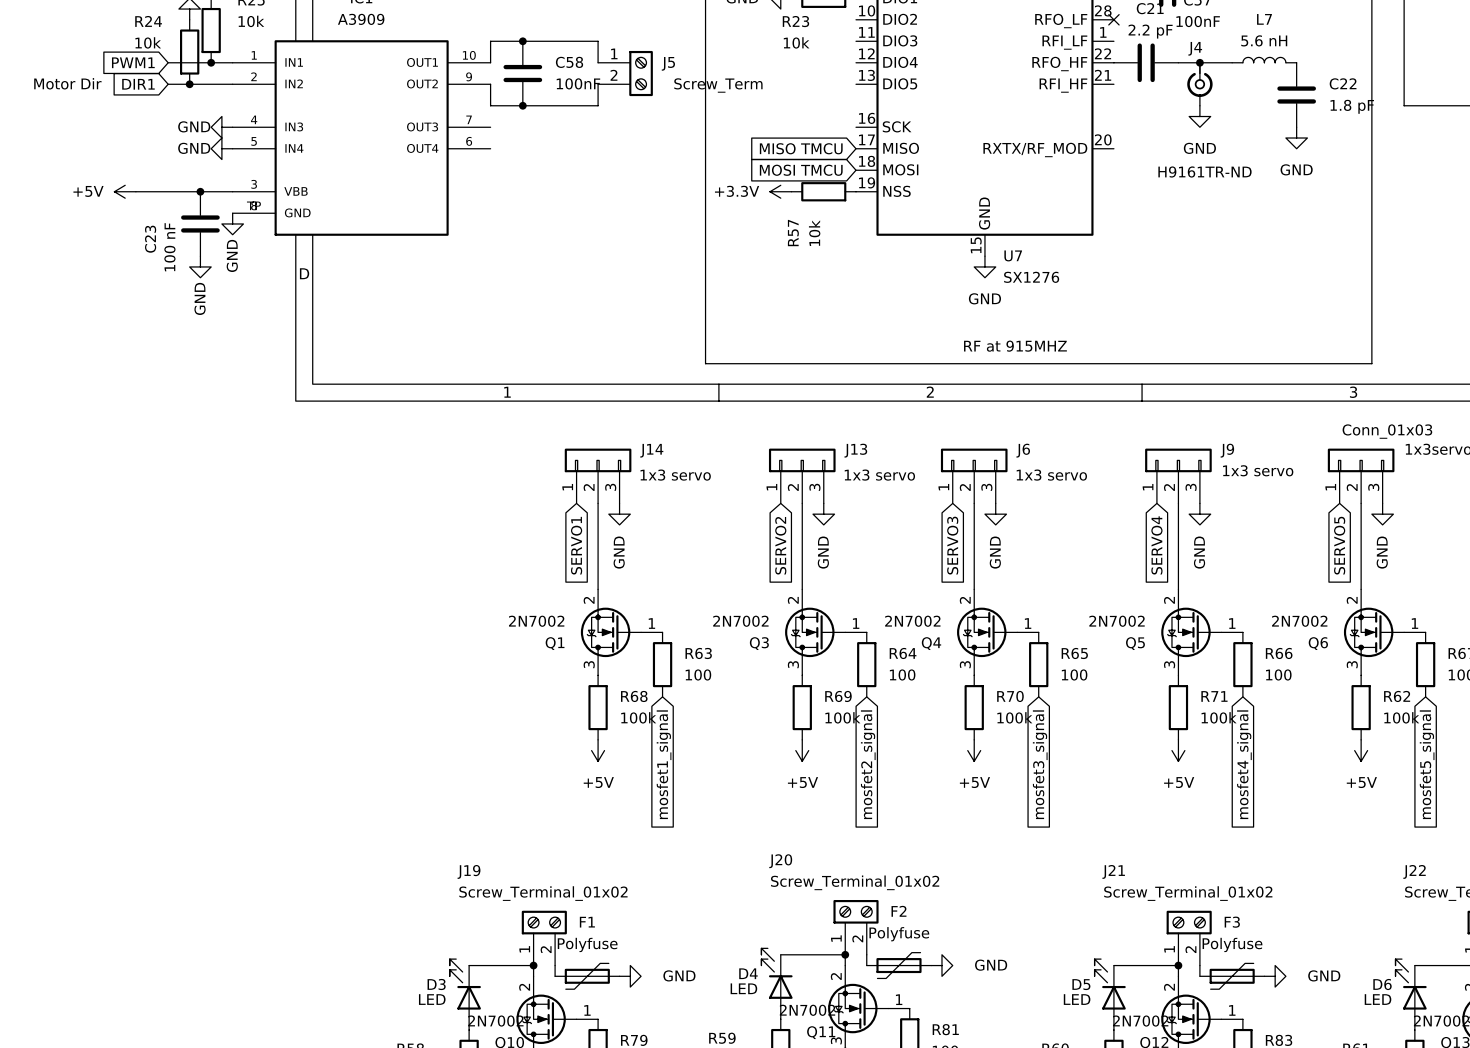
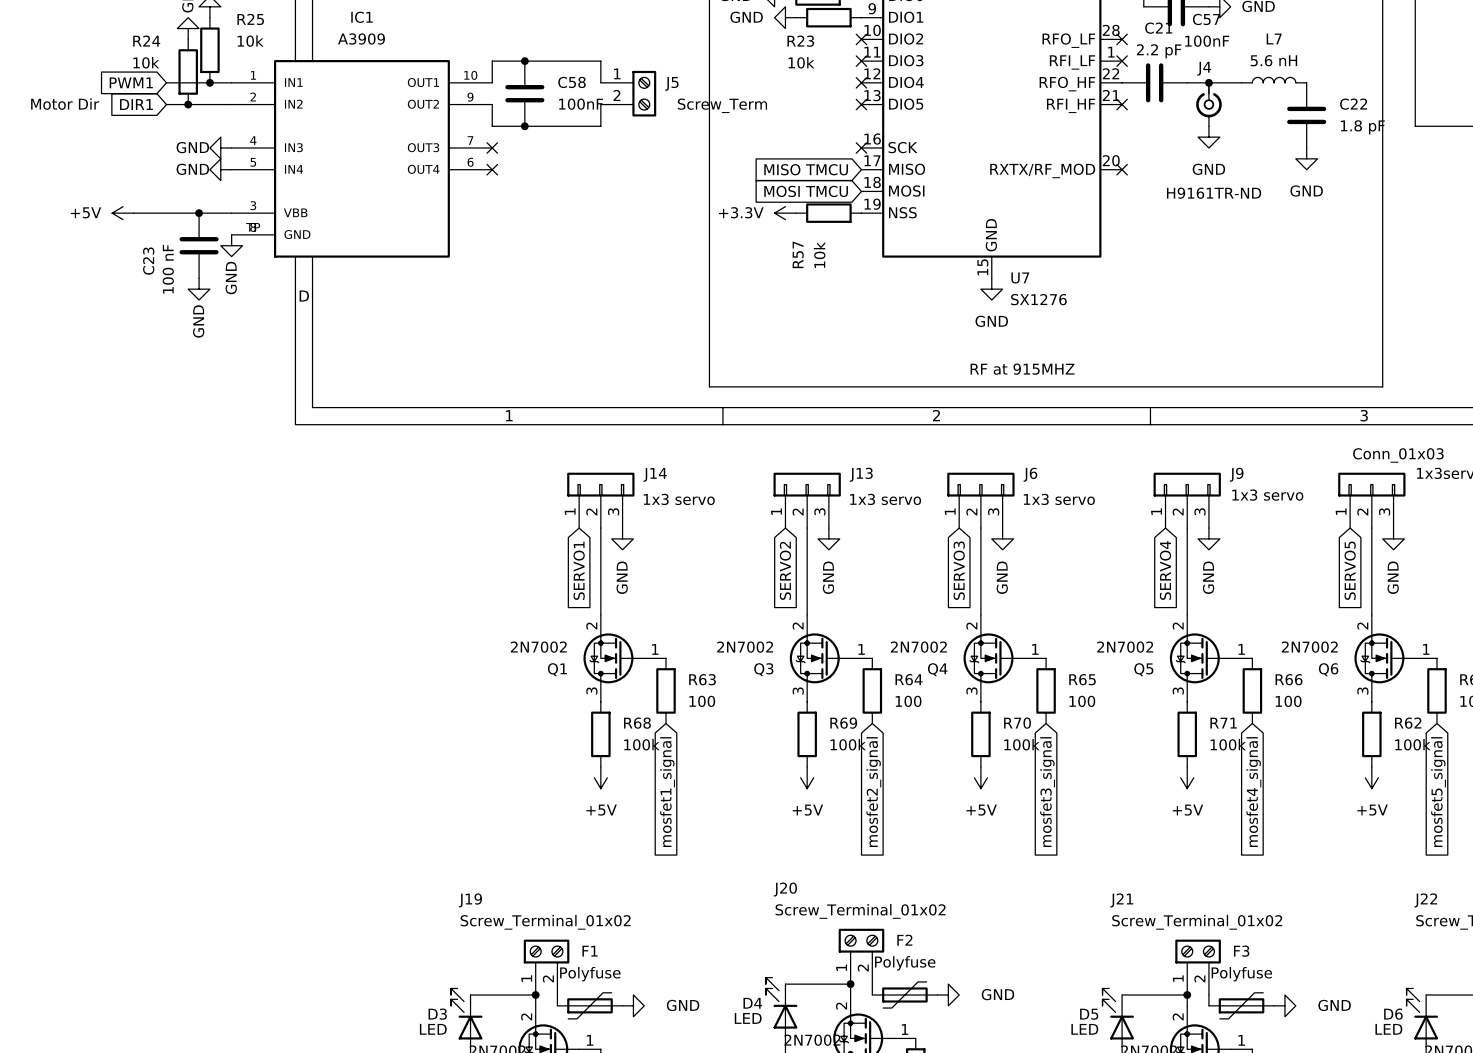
no-connect mark: none -> (861, 39)
no-connect mark: none -> (861, 61)
no-connect mark: none -> (1122, 61)
no-connect mark: none -> (861, 82)
no-connect mark: none -> (861, 104)
no-connect mark: none -> (1122, 104)
no-connect mark: none -> (492, 147)
no-connect mark: none -> (861, 147)
no-connect mark: none -> (492, 169)
no-connect mark: none -> (1122, 169)

